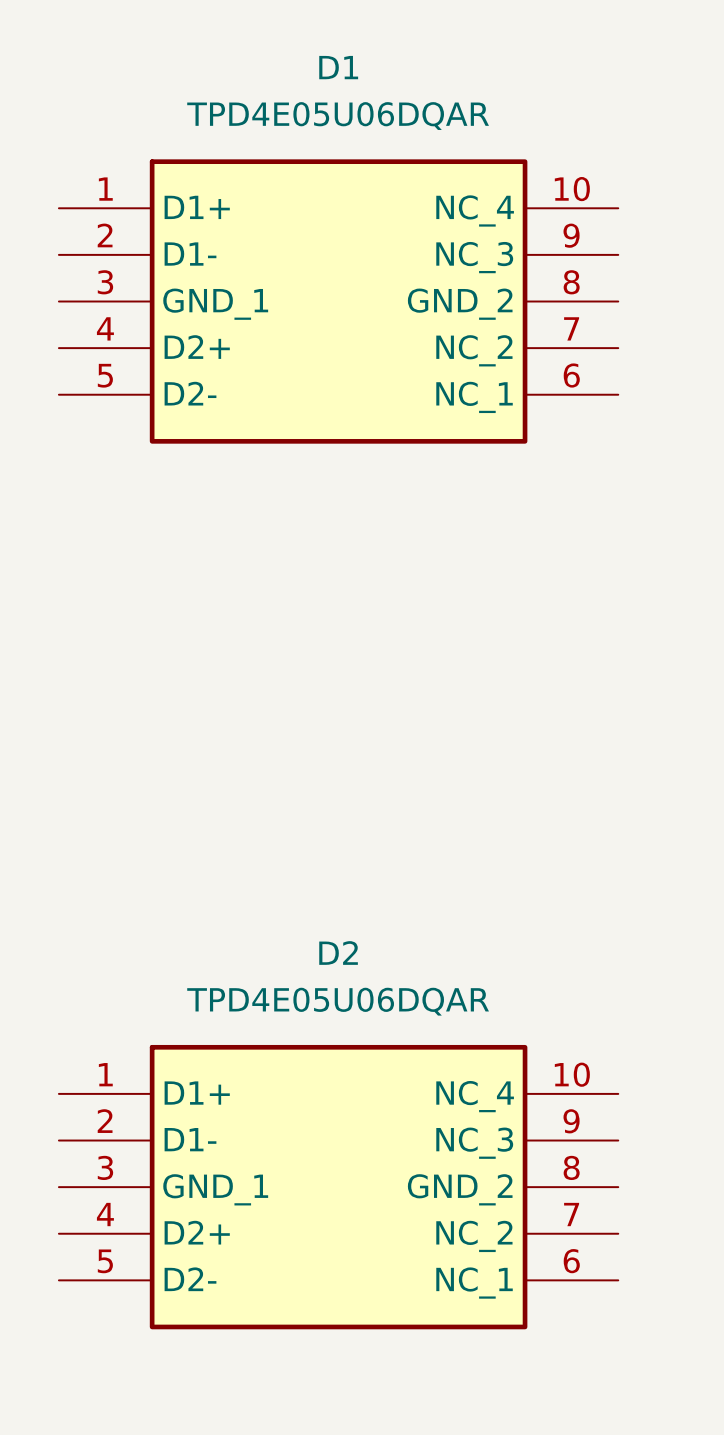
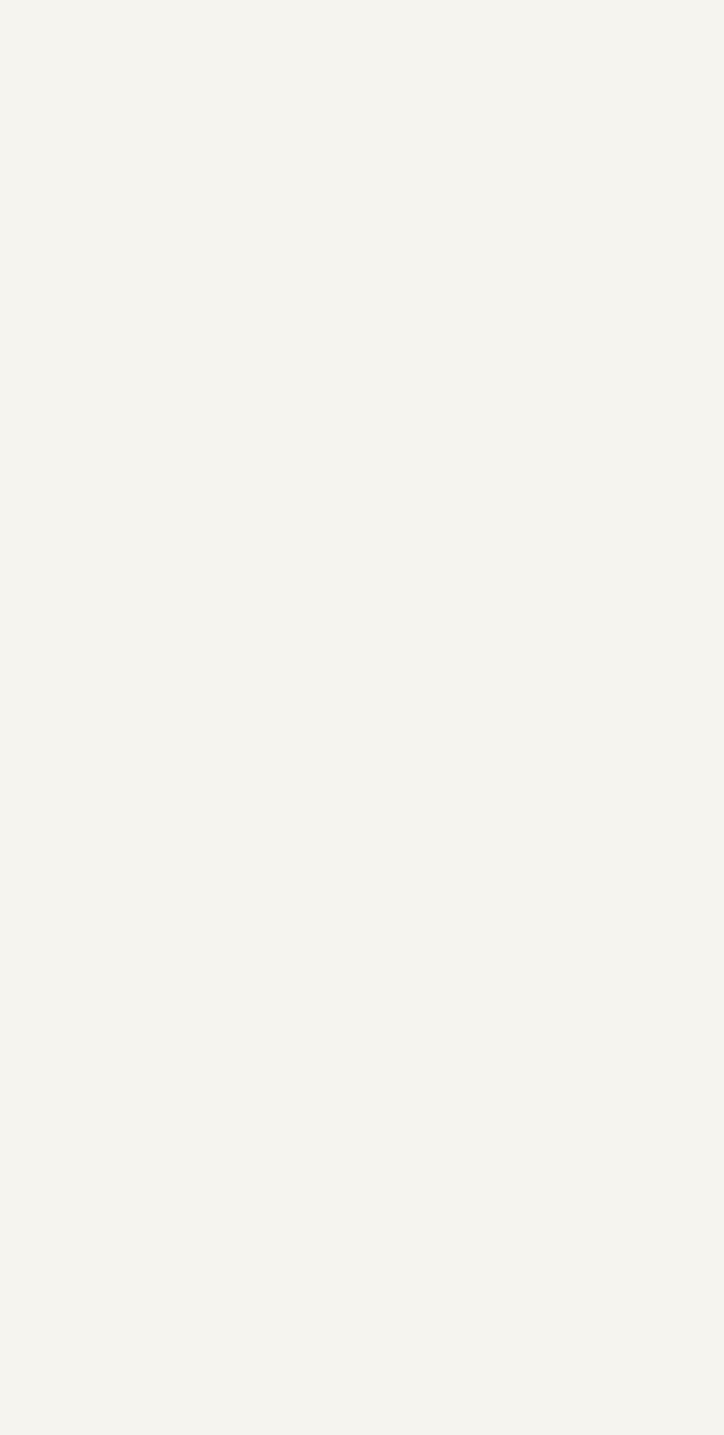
D1: TPD4E05U06DQAR (338, 301) -> none
D2: TPD4E05U06DQAR (338, 1187) -> none

